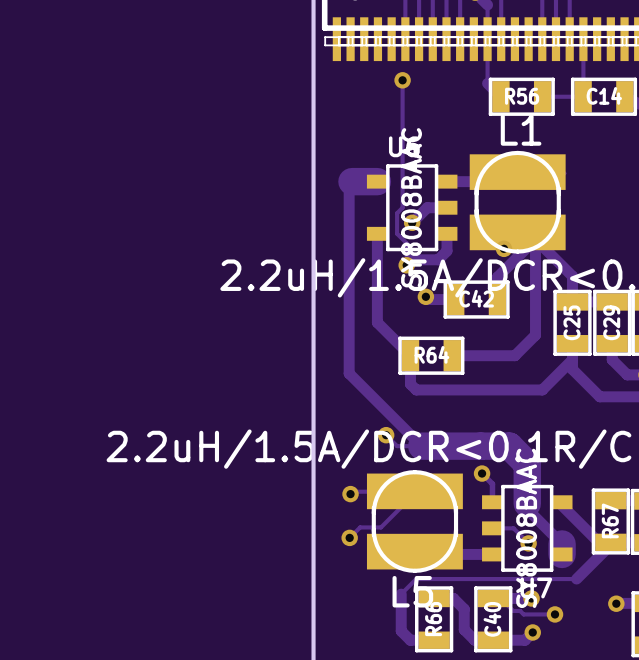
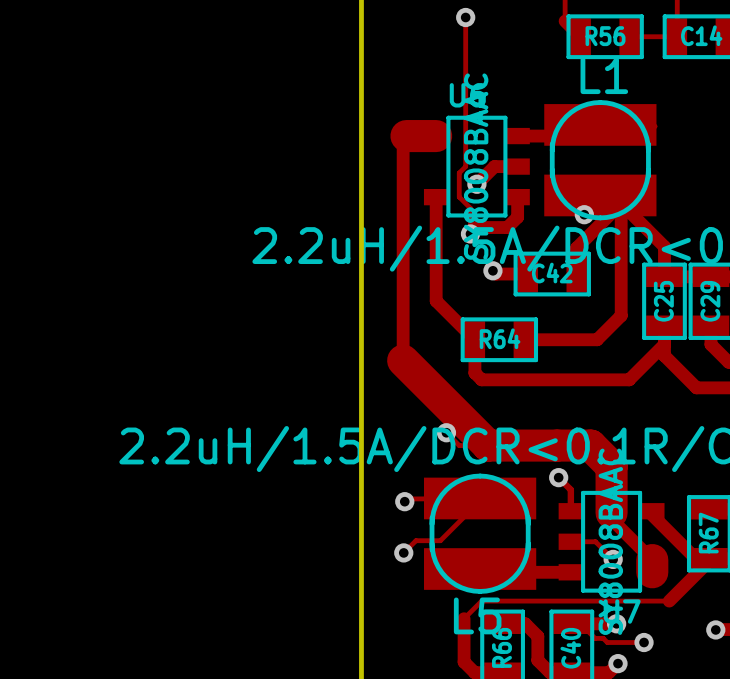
track width: thin (349, 373) (421, 446) -> thick (403, 360) (488, 445)

